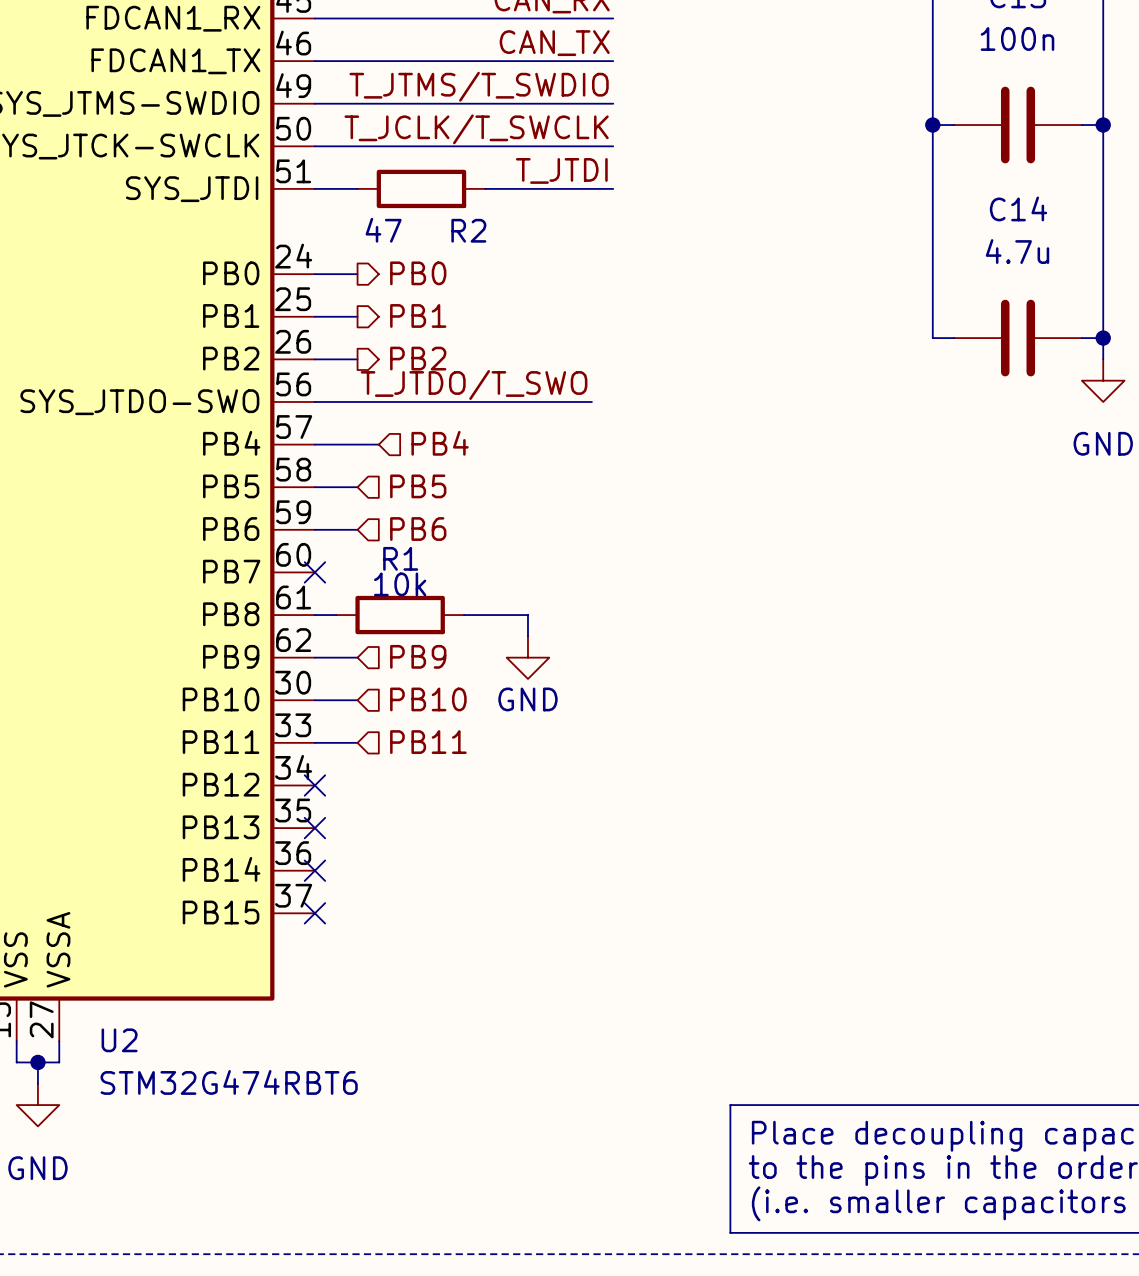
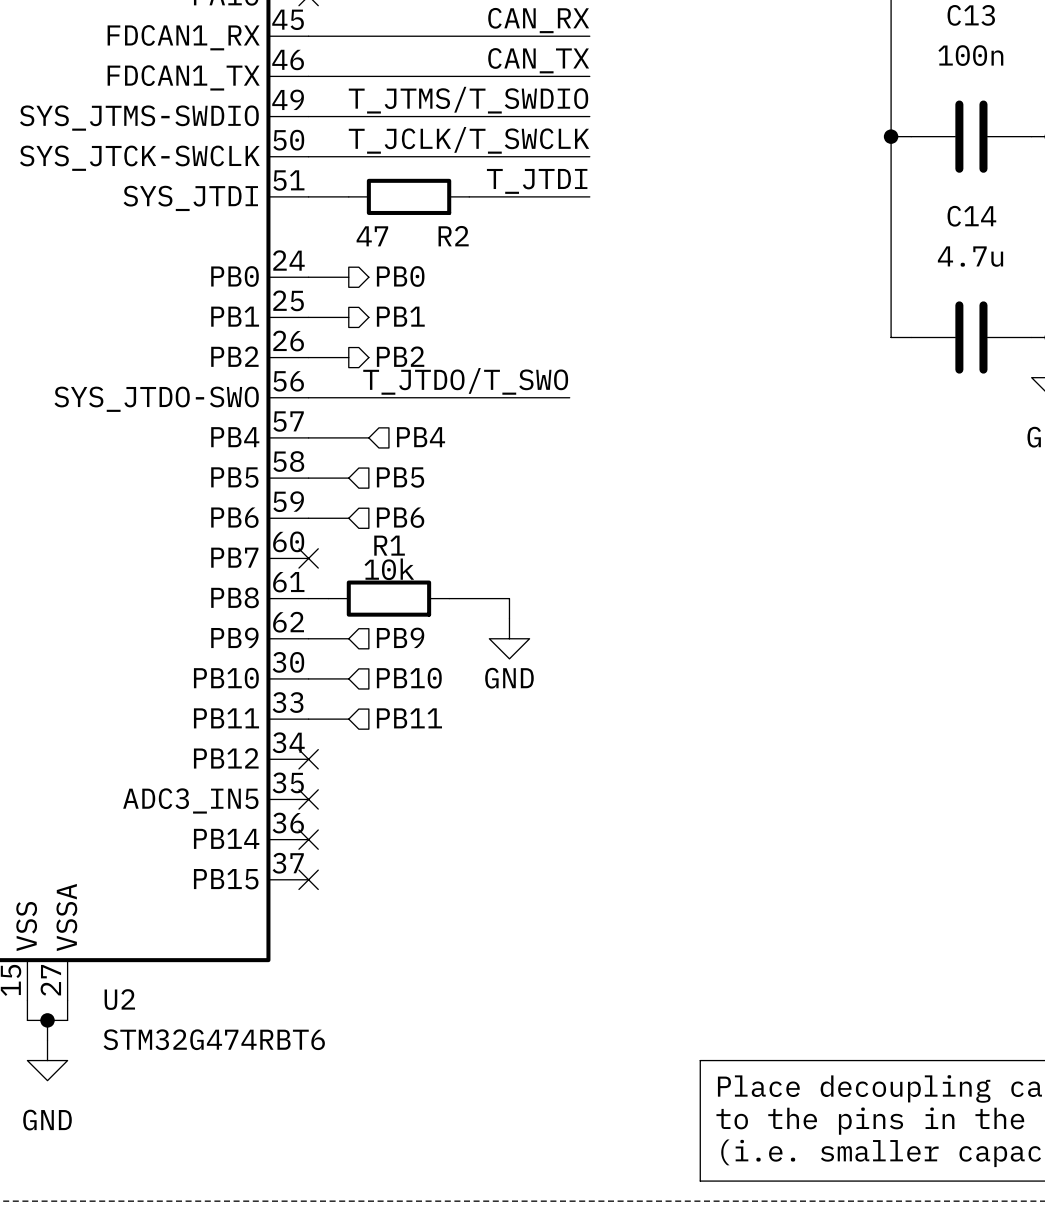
U2 pin name: PB13 (221, 827) -> ADC3_IN5 (190, 800)

